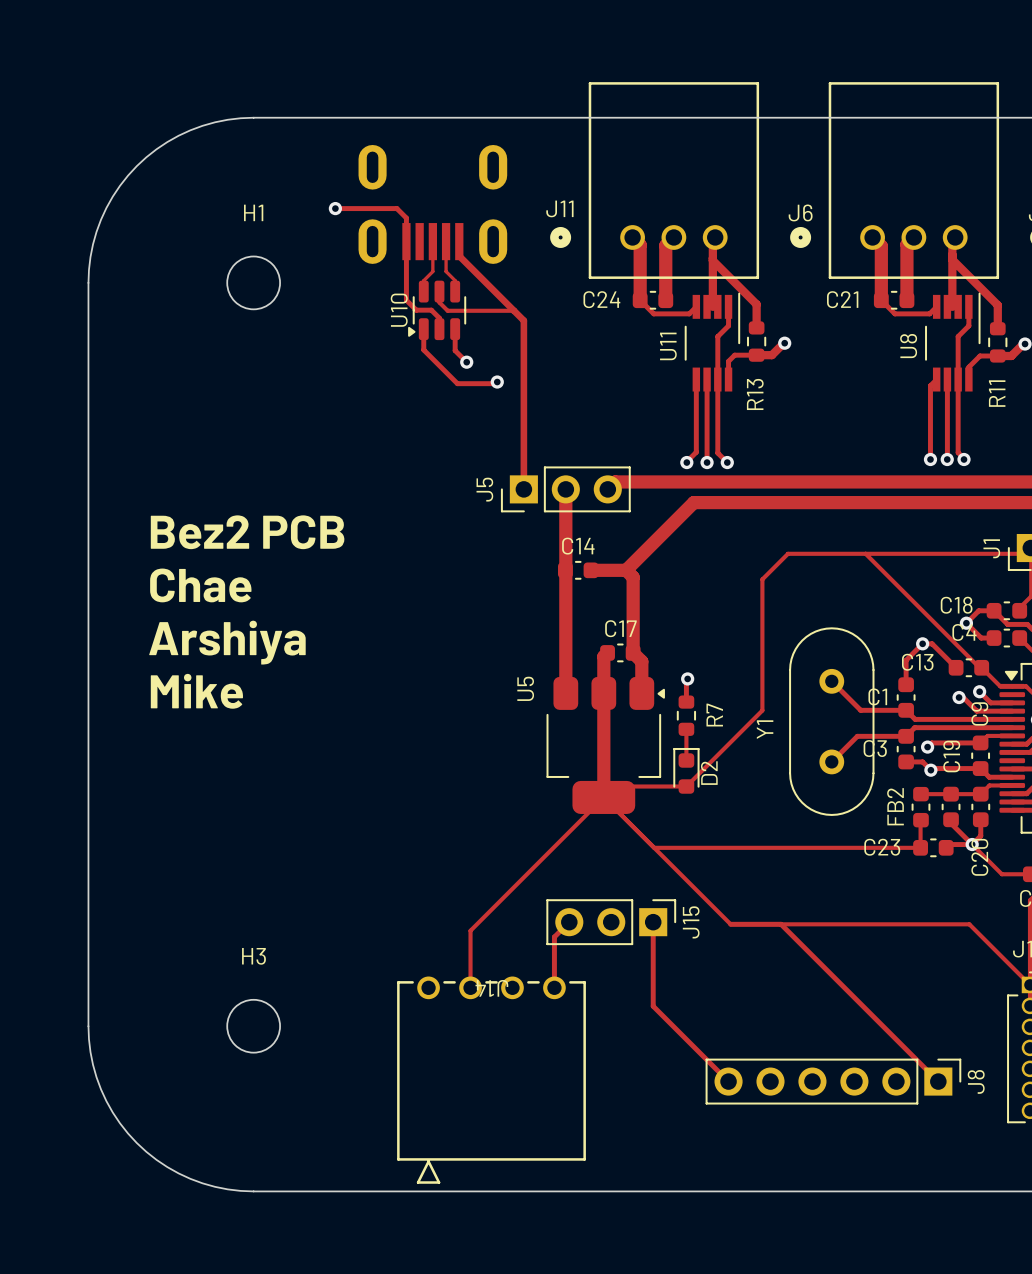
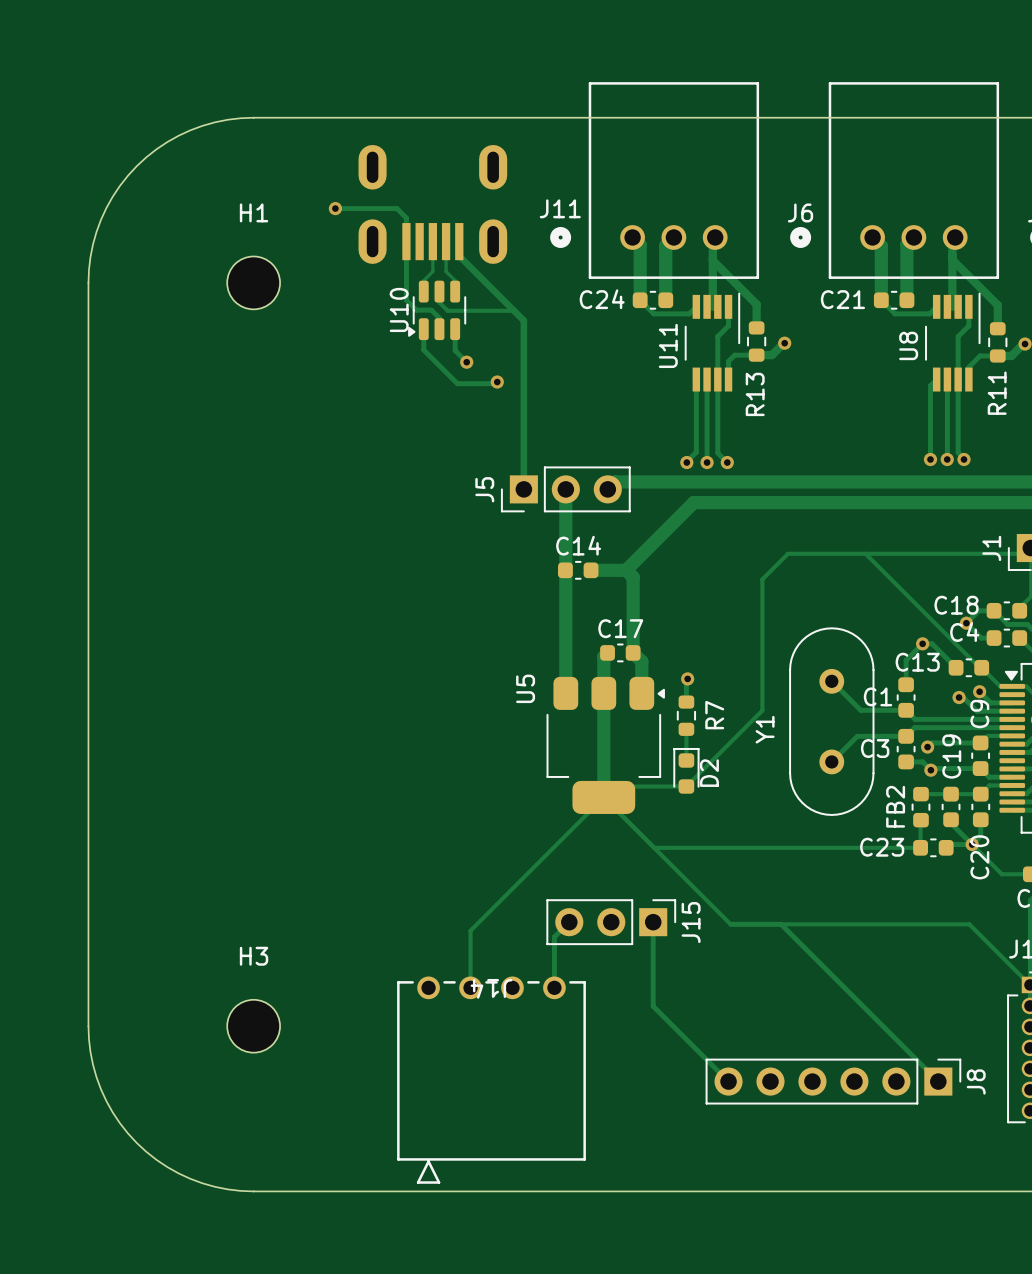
text: Bez2 PCB (247, 532) -> none
text: Chae (200, 585) -> none
text: Arshiya (227, 642) -> none
text: Mike (196, 691) -> none

